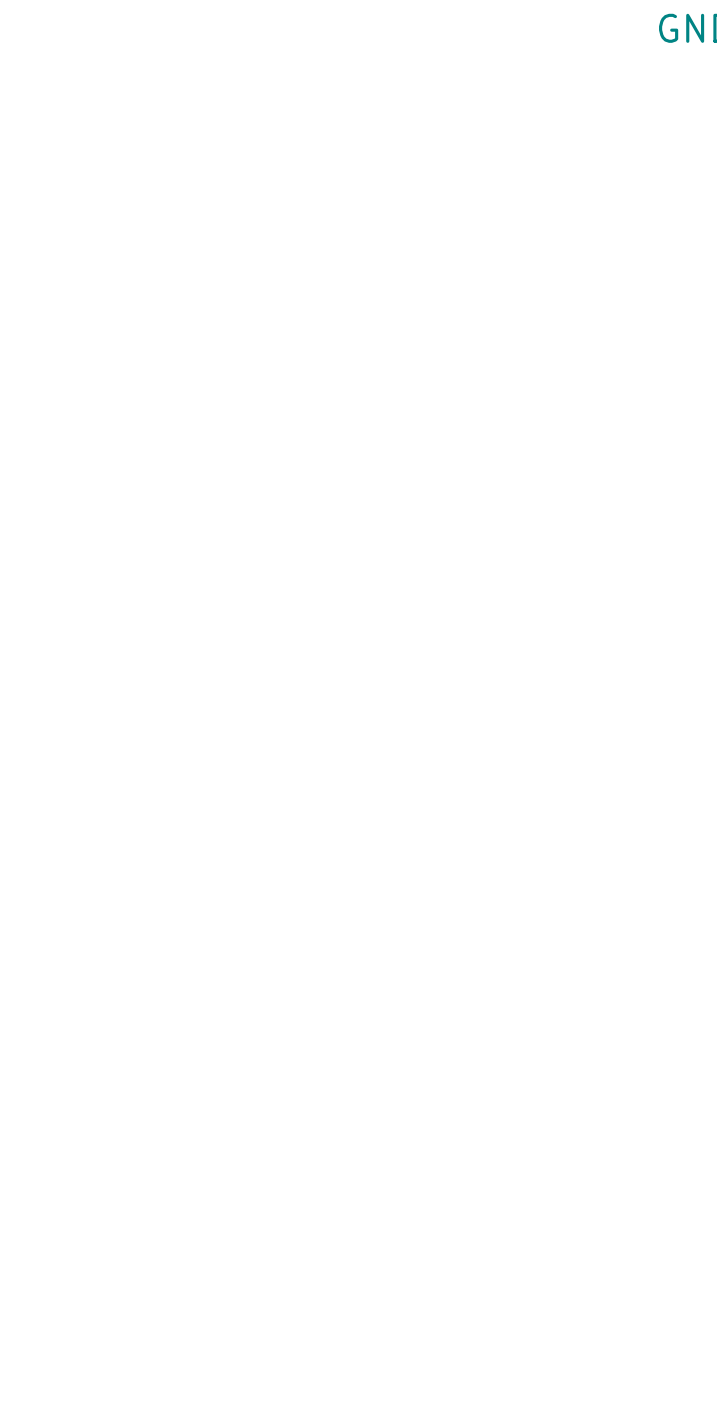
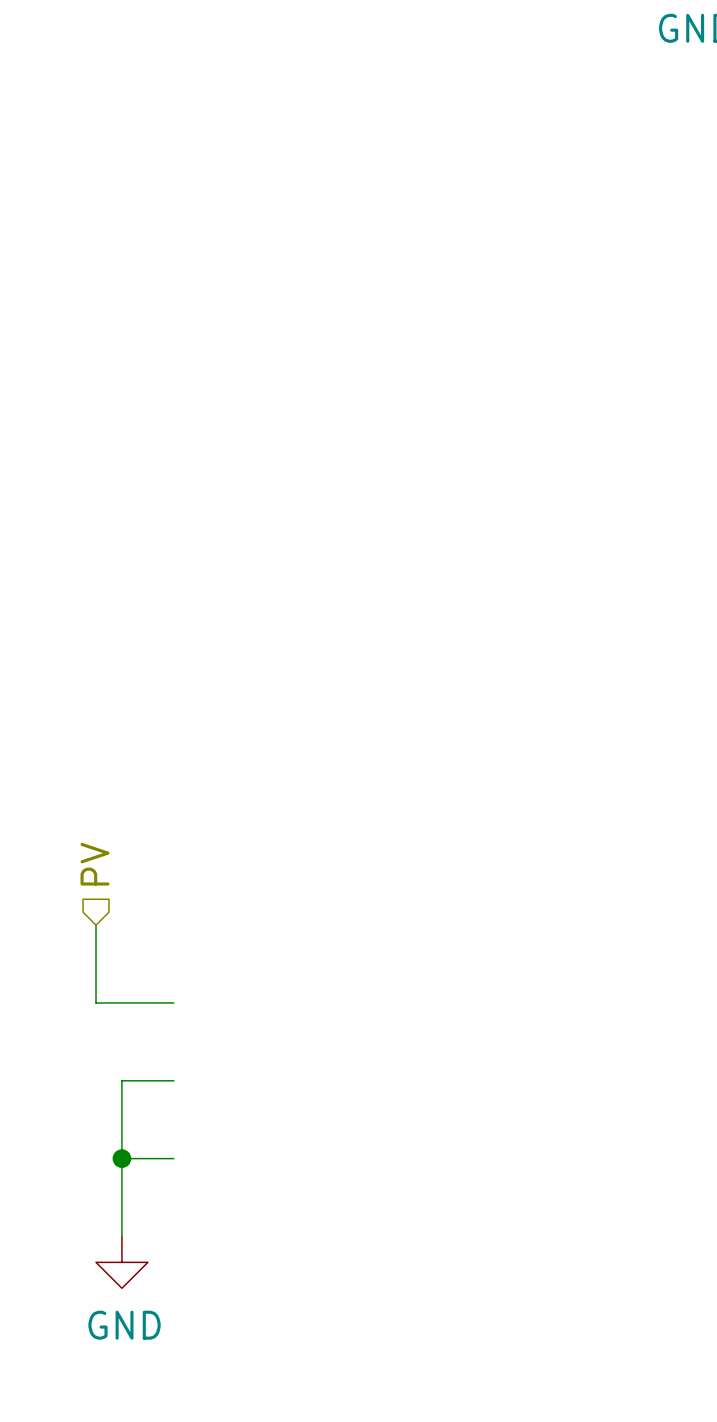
hierarchical label: none -> PV (95, 864)
wire: none -> (96, 925) (96, 1002) (173, 1002)
wire: none -> (173, 1080) (121, 1080) (121, 1236)
wire: none -> (121, 1158) (173, 1158)
junction: none -> (121, 1158)
power symbol: none -> GND (121, 1262)

